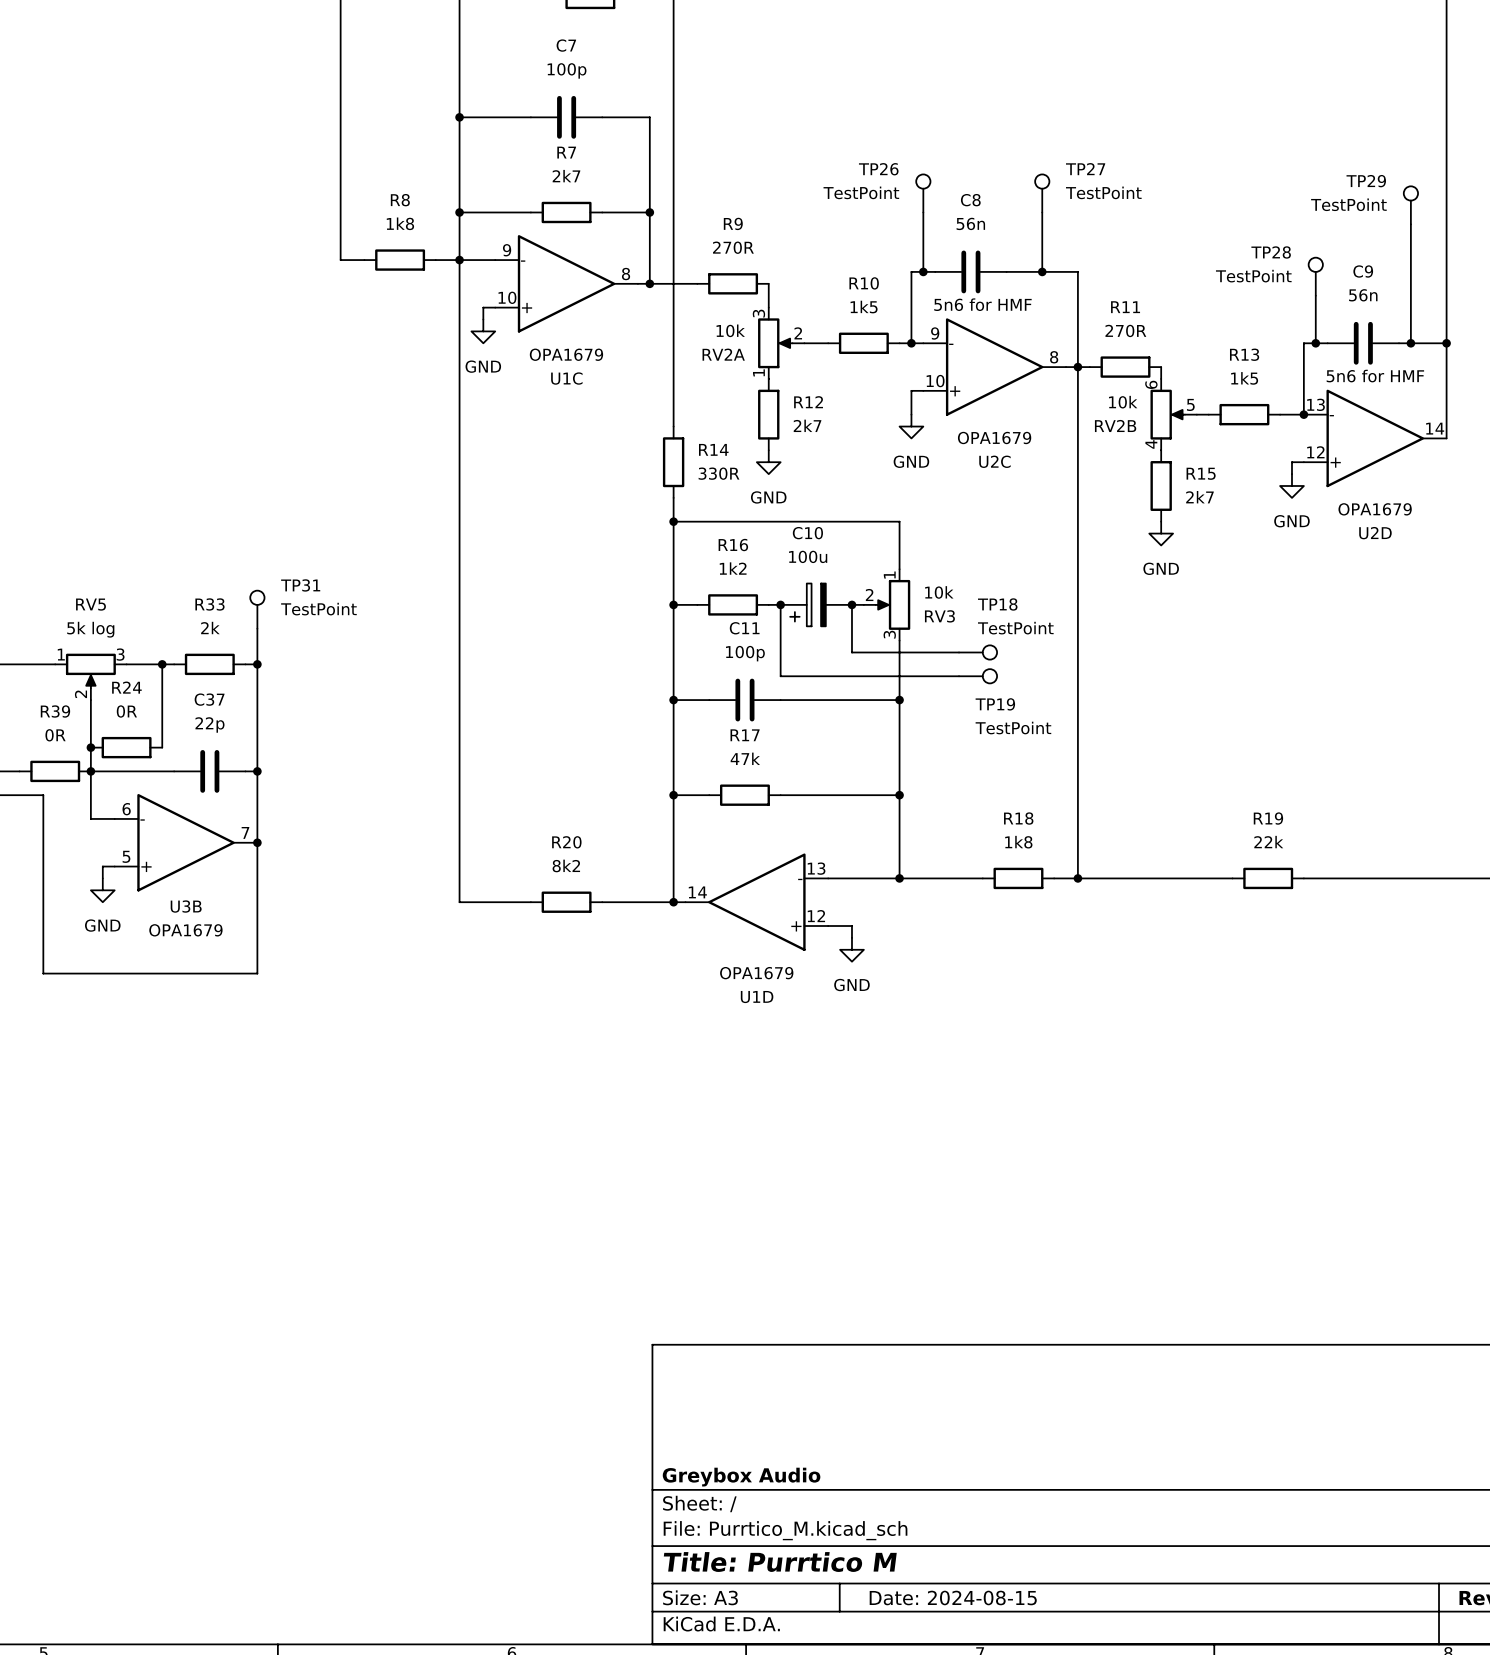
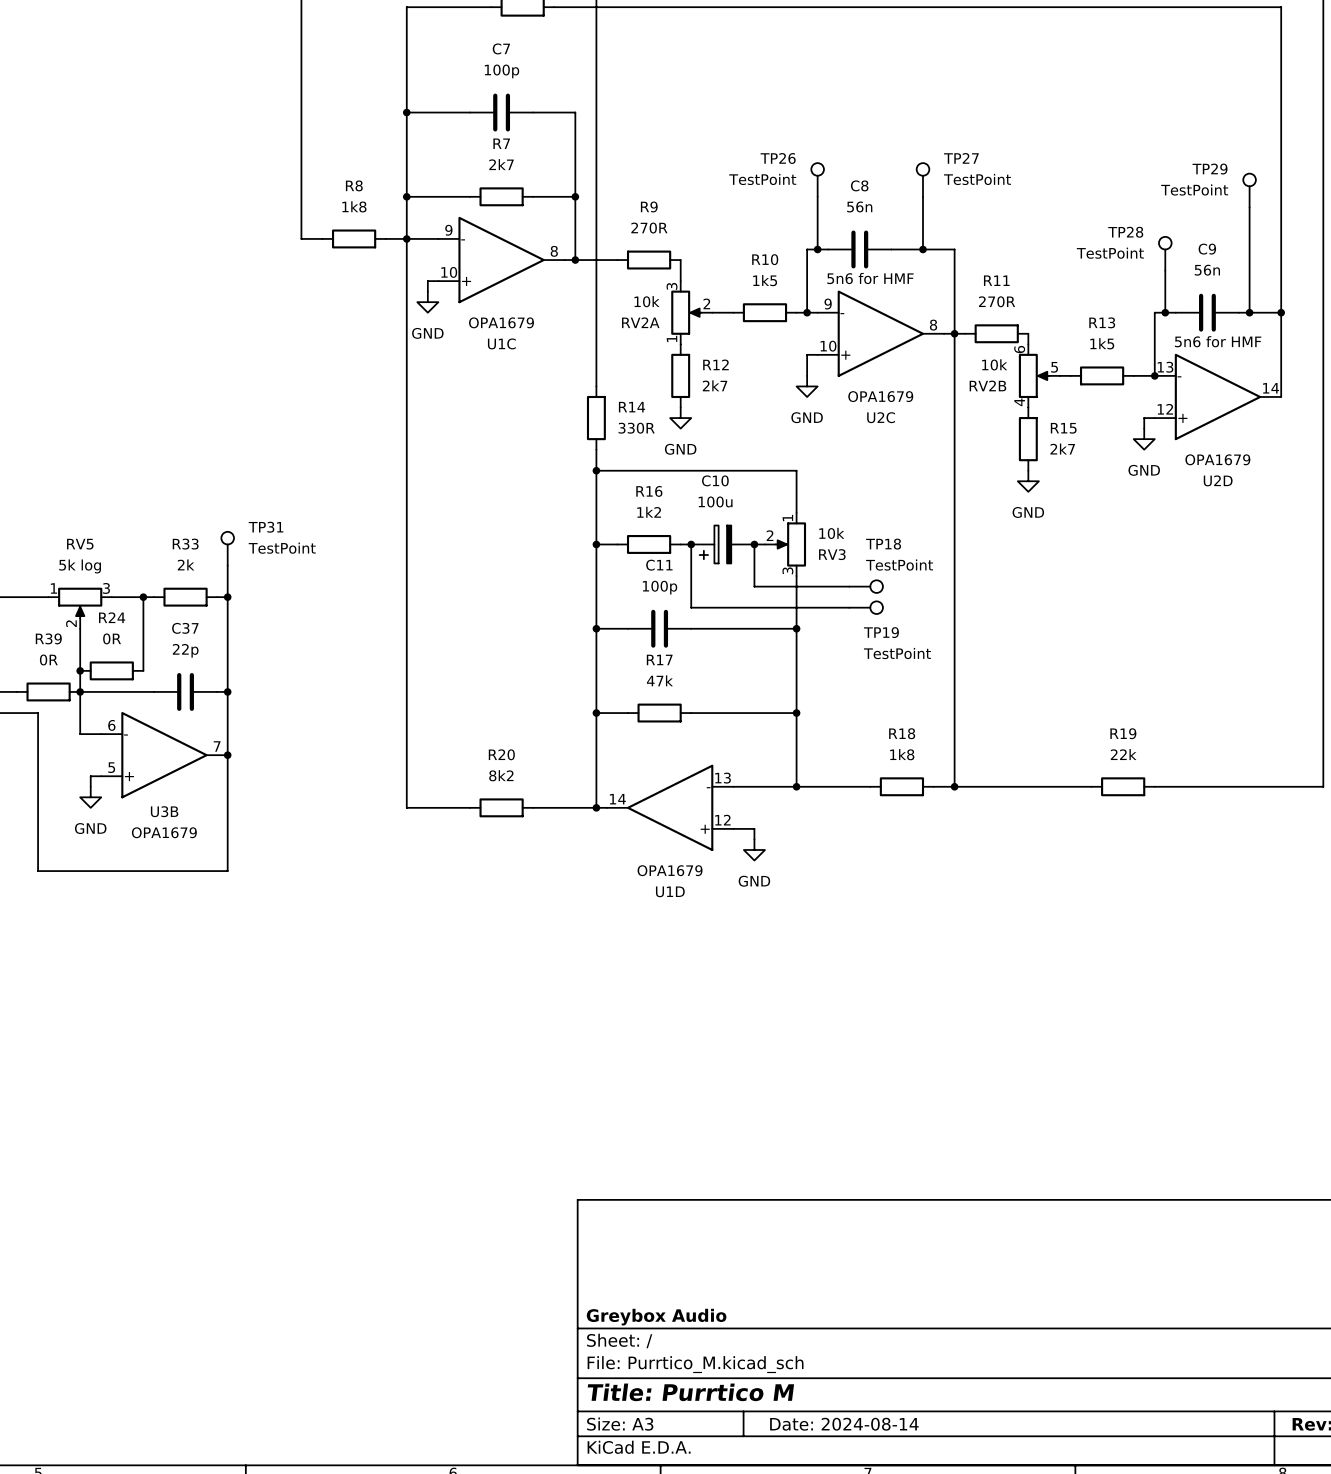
title block: Date: 2024-08-15 (953, 1597) -> Date: 2024-08-14 (844, 1424)

